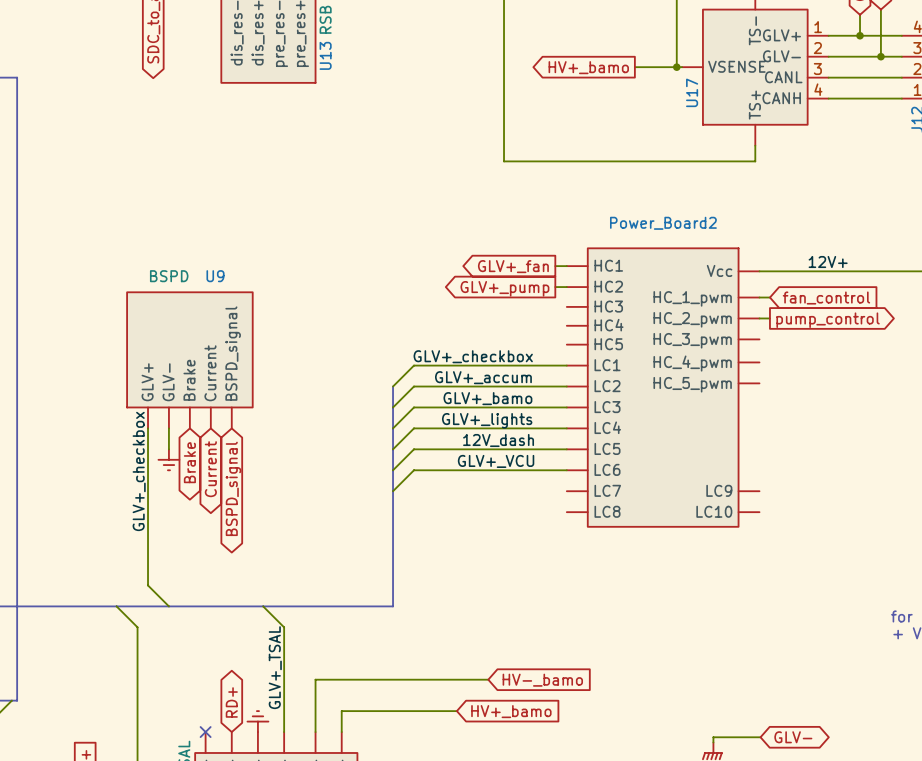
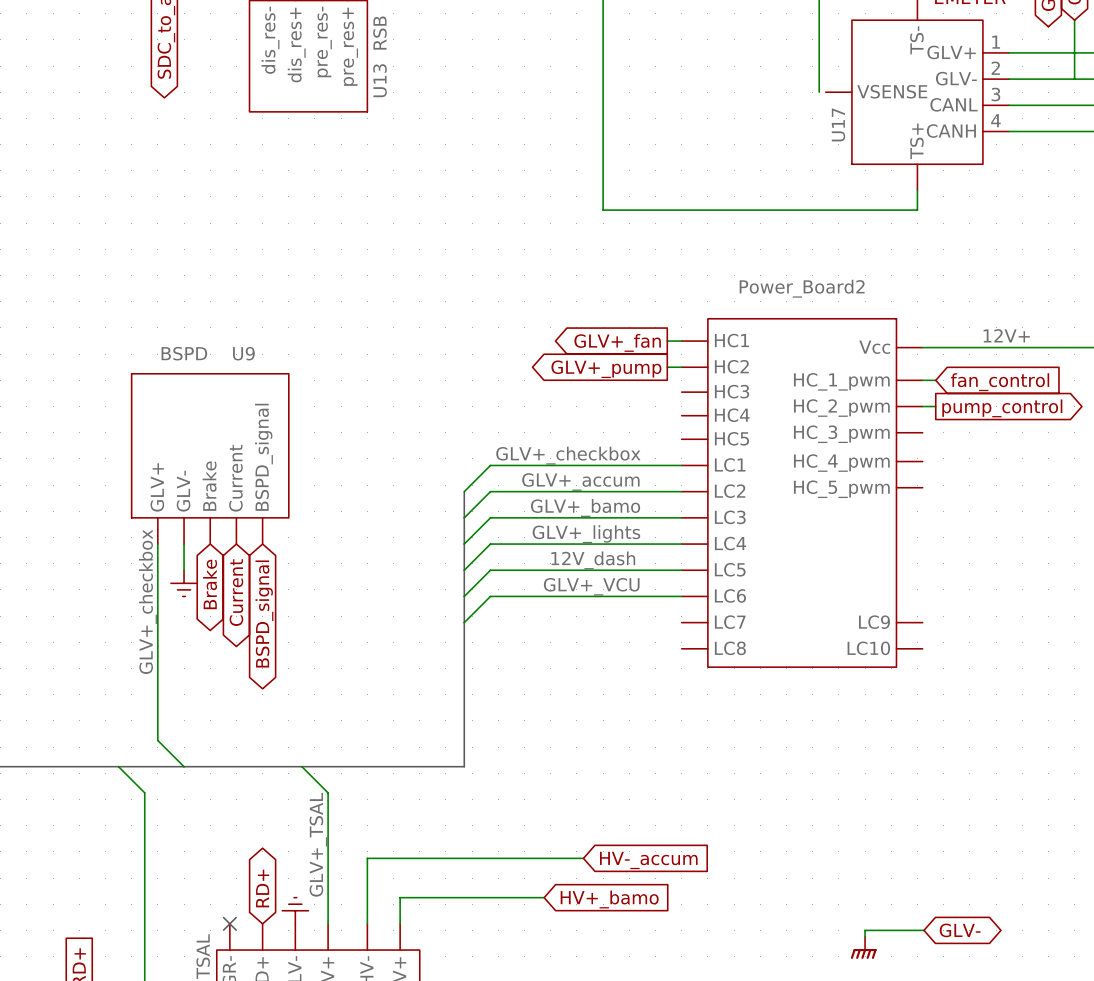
wire: (860, 14) (860, 35) -> none
junction: (860, 35) -> none
junction: (880, 56) -> none
global label: HV+_bamo (588, 67) -> none
wire: (634, 67) (682, 67) -> none
junction: (676, 67) -> none
global label: HV-_bamo (542, 680) -> HV-_accum (648, 860)

